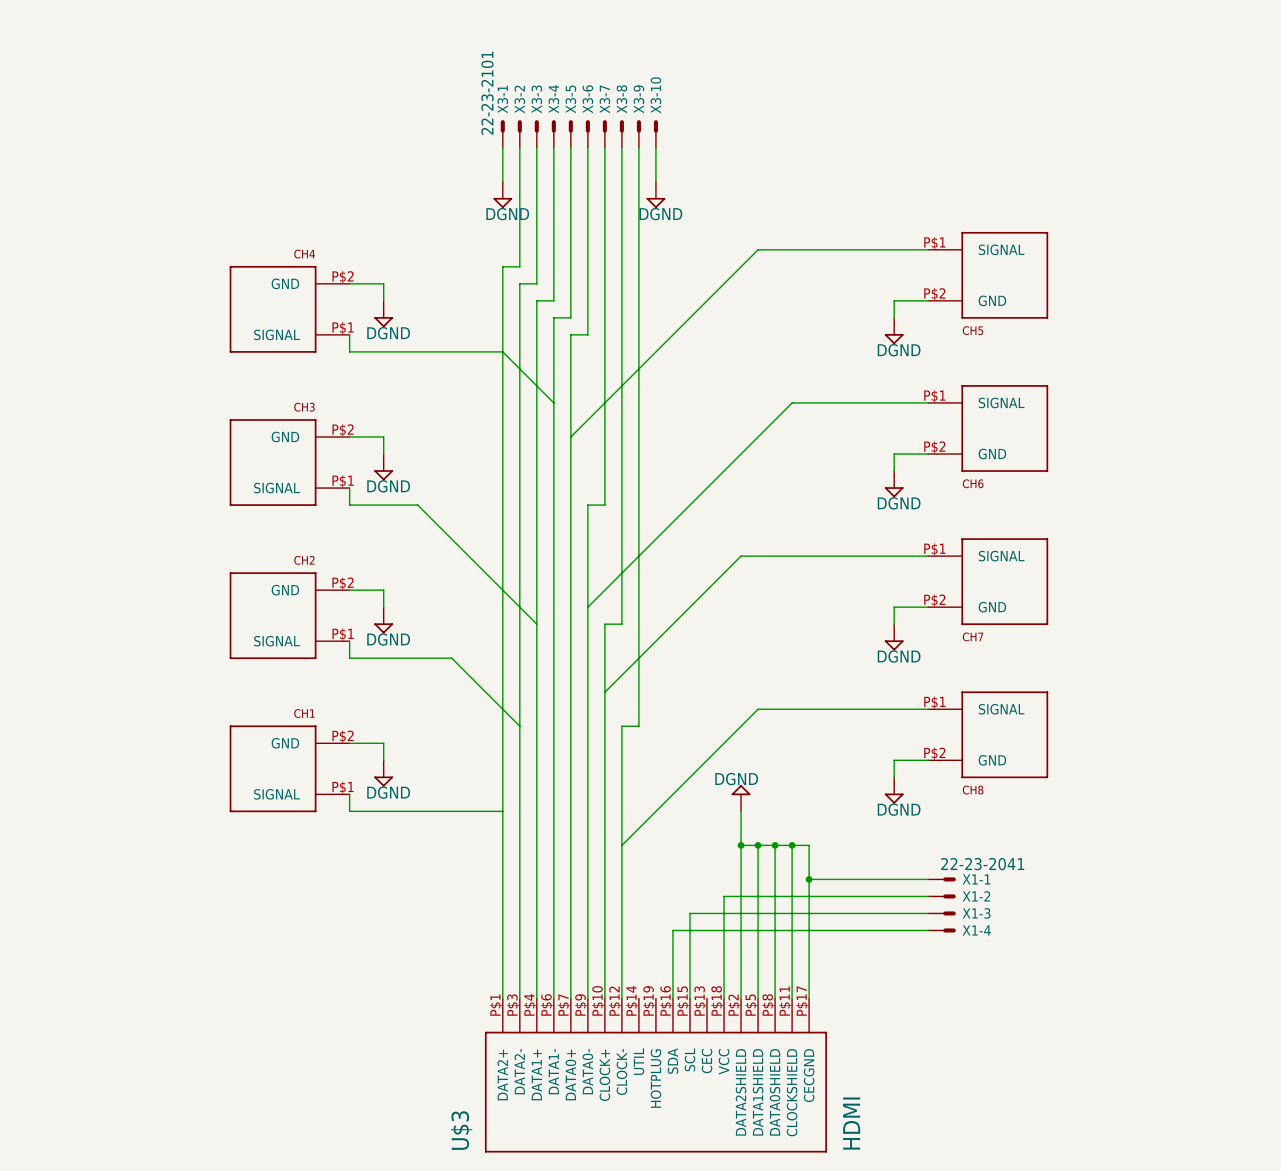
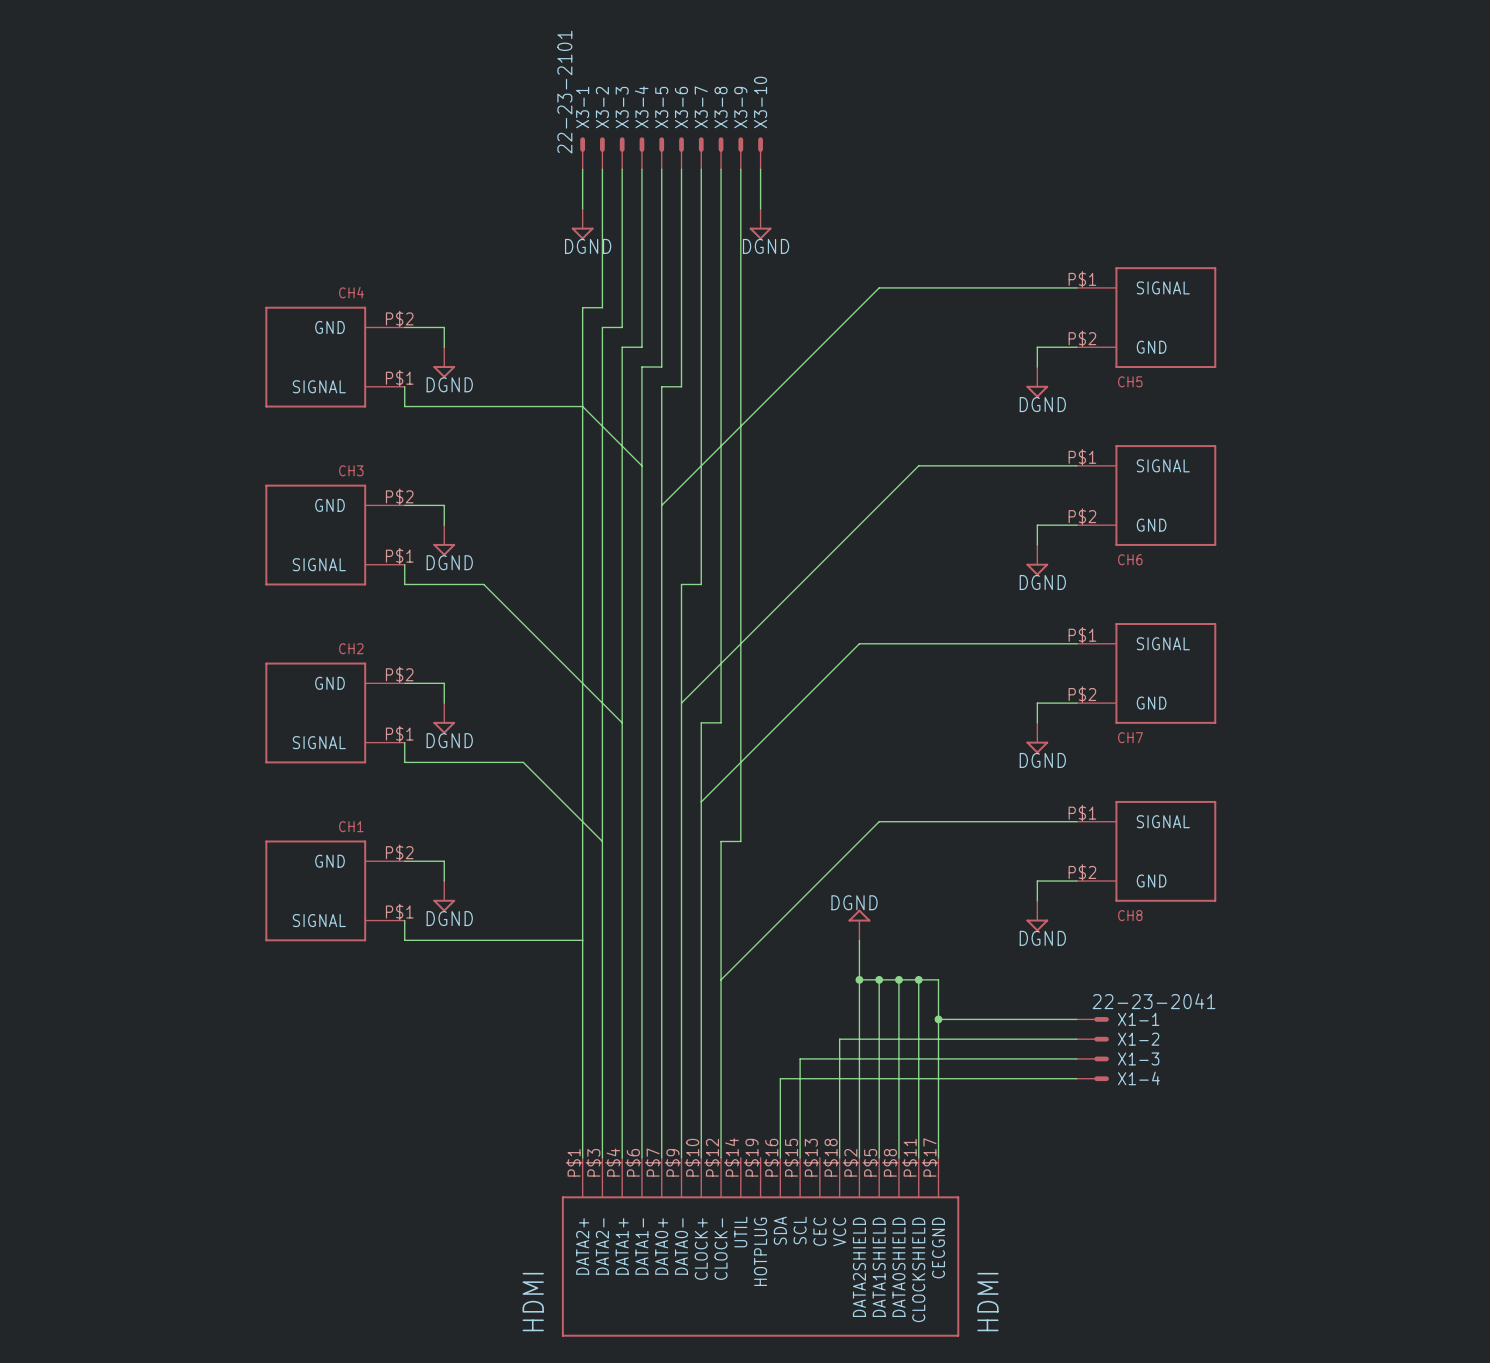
U$3 name: U$3 (461, 1130) -> HDMI (533, 1302)

